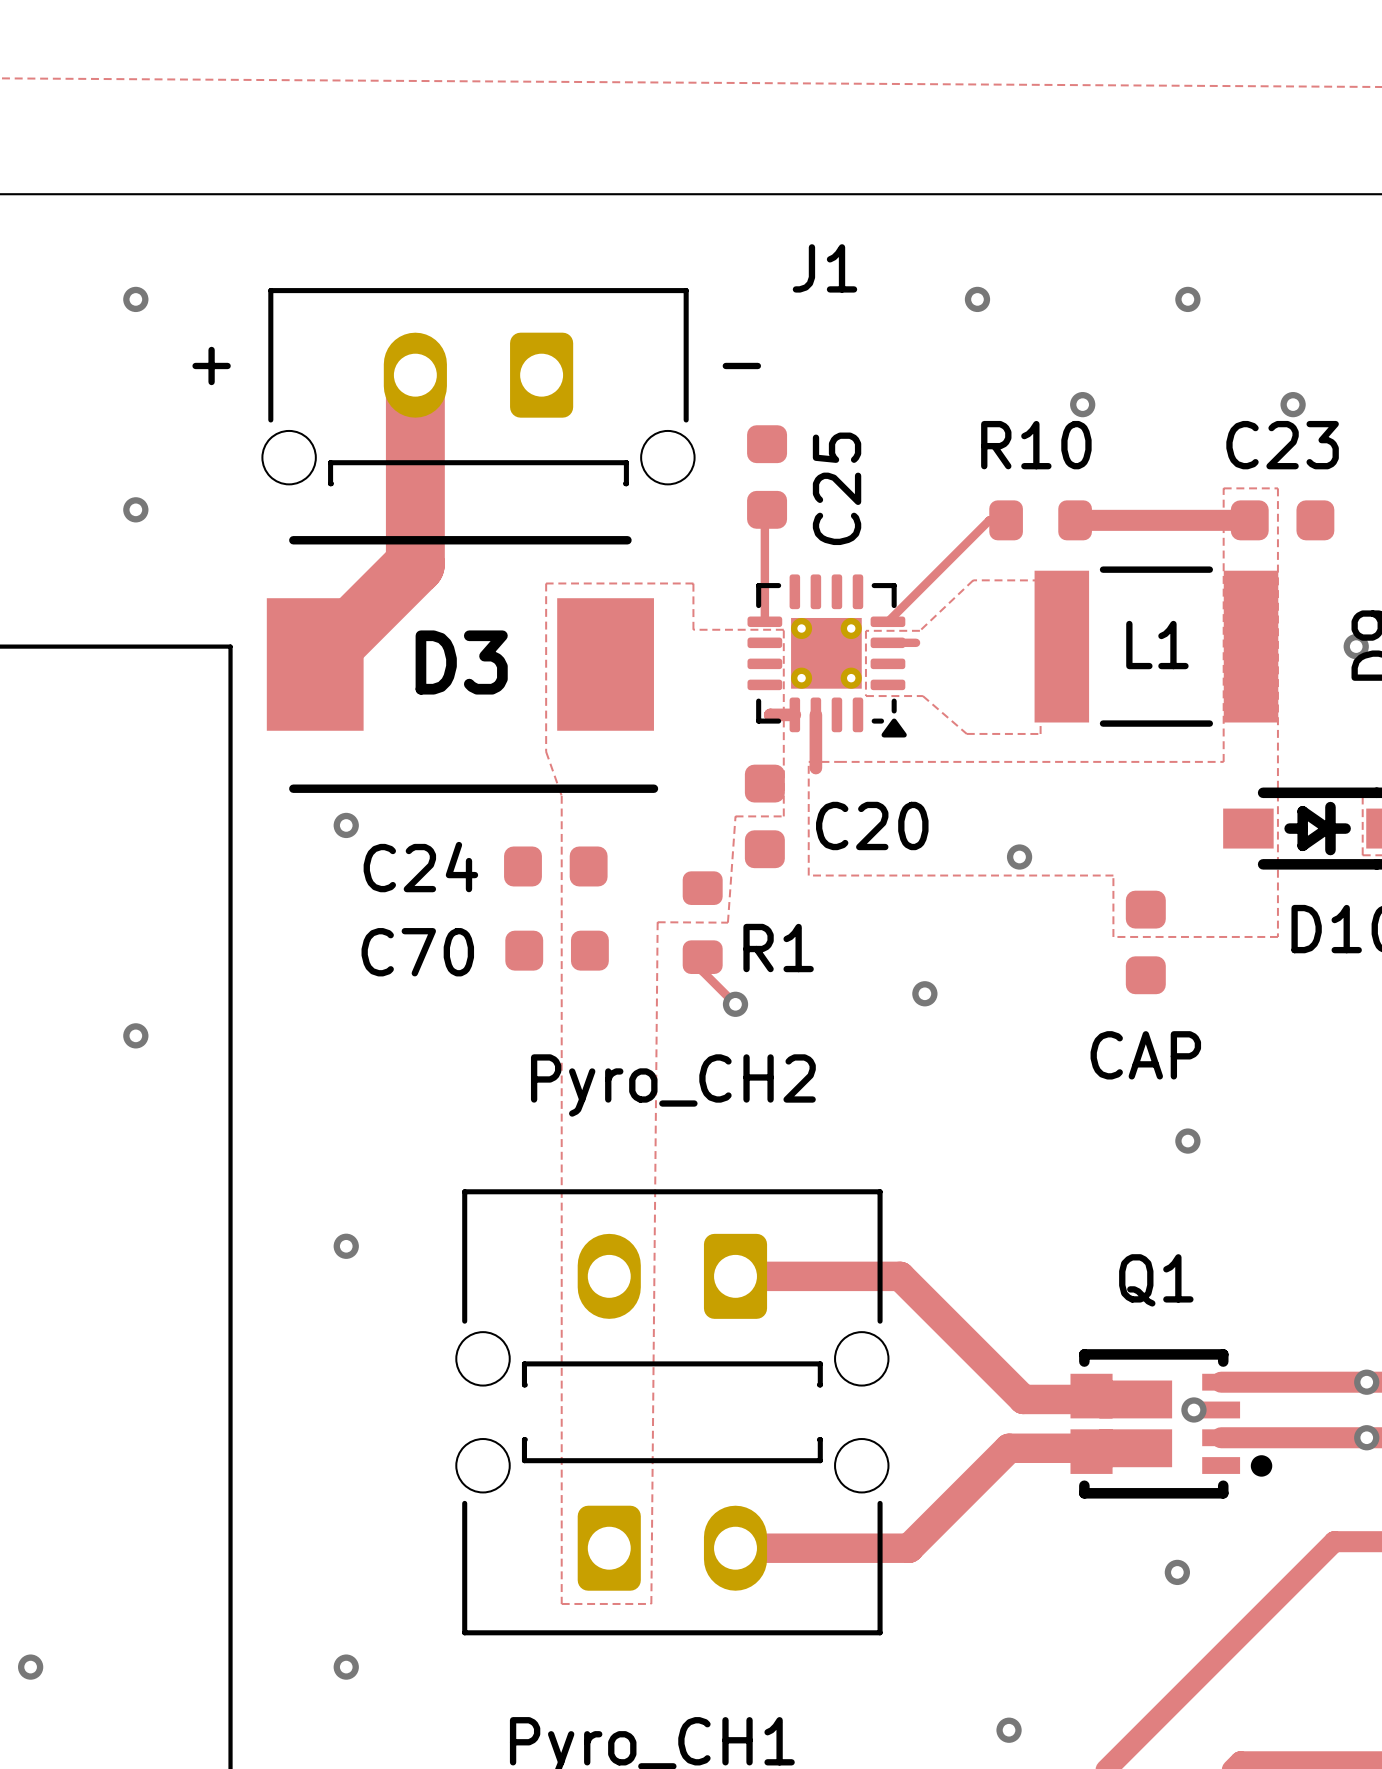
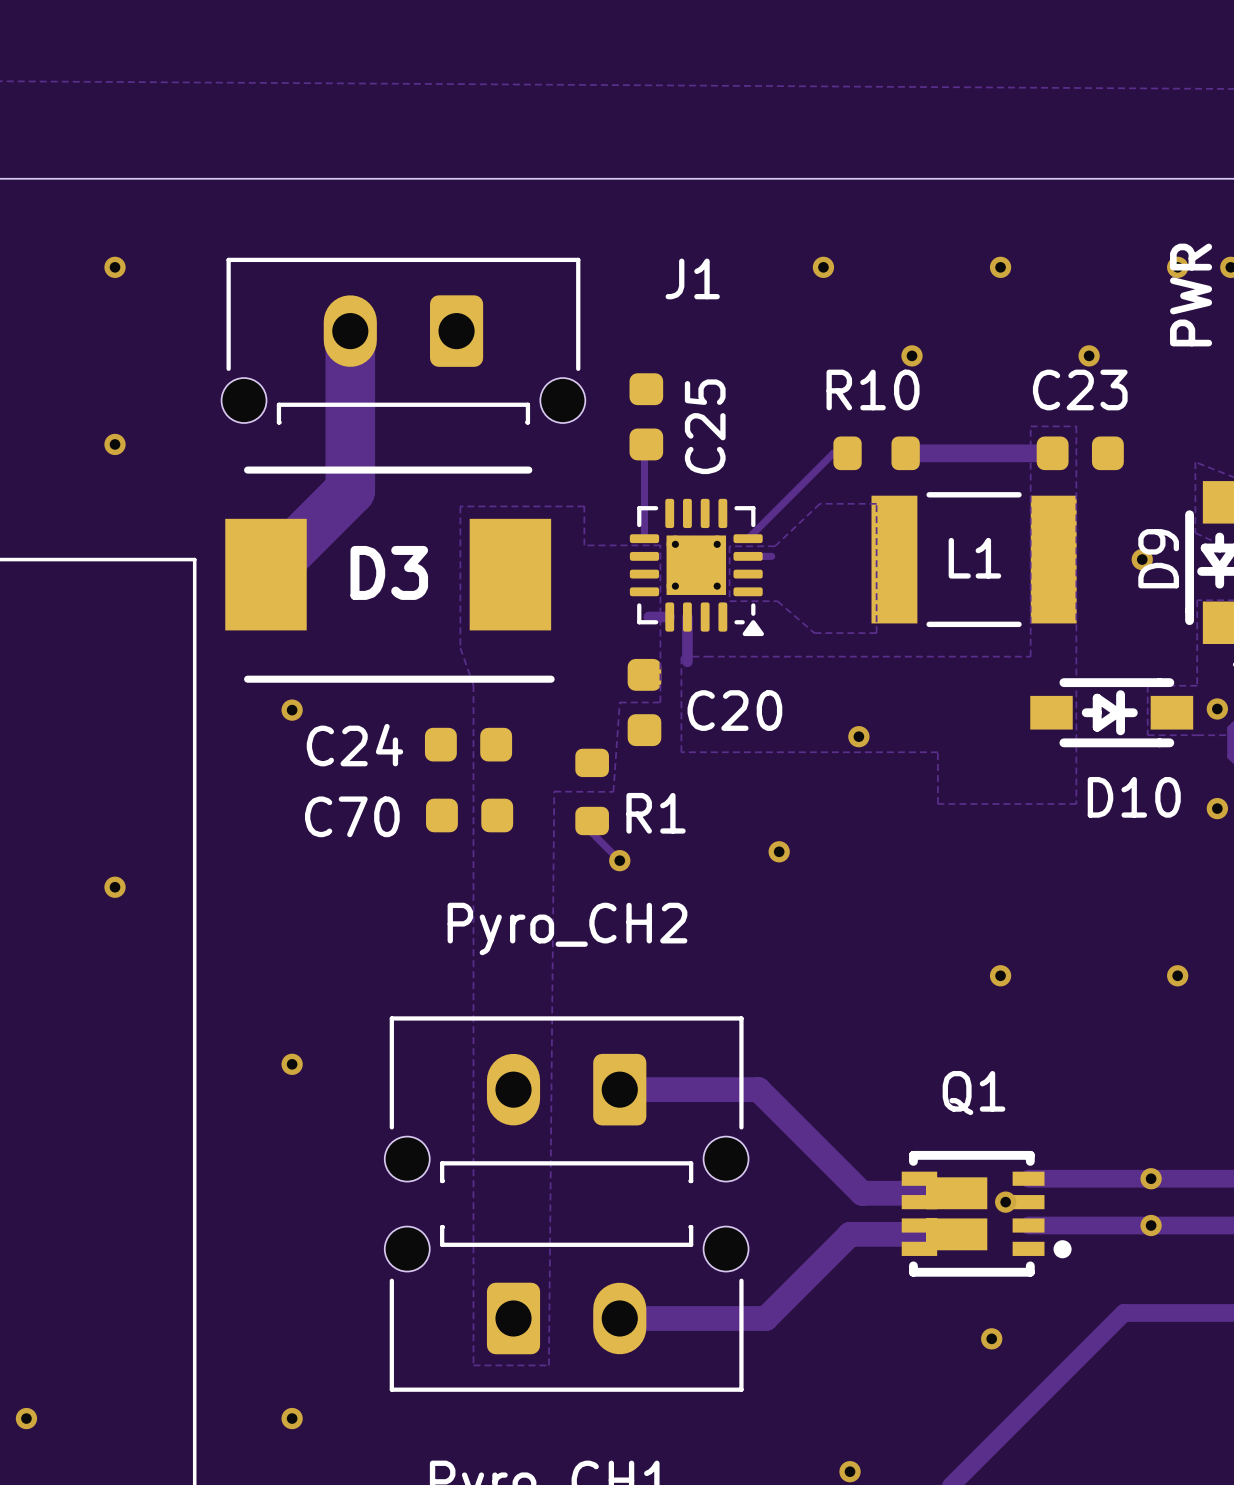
J1 name position: J1 (824, 268) -> J1 (692, 278)
text: + (211, 365) -> none
text: - (741, 365) -> none
part: (1145, 942) -> none
text: CAP (1145, 1055) -> none

